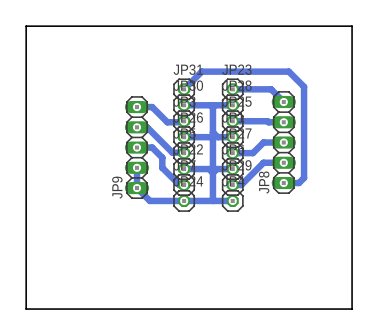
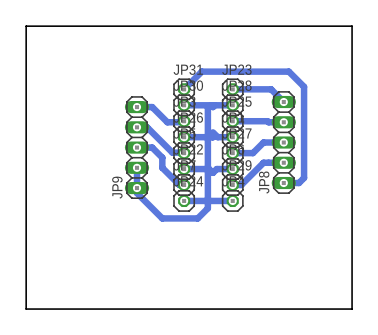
bottom track: (212, 107) (212, 200) -> none
bottom track: (137, 188) (149, 200) (184, 200) -> (137, 188) (137, 193) (162, 218) (197, 218) (207, 208) (207, 107)

